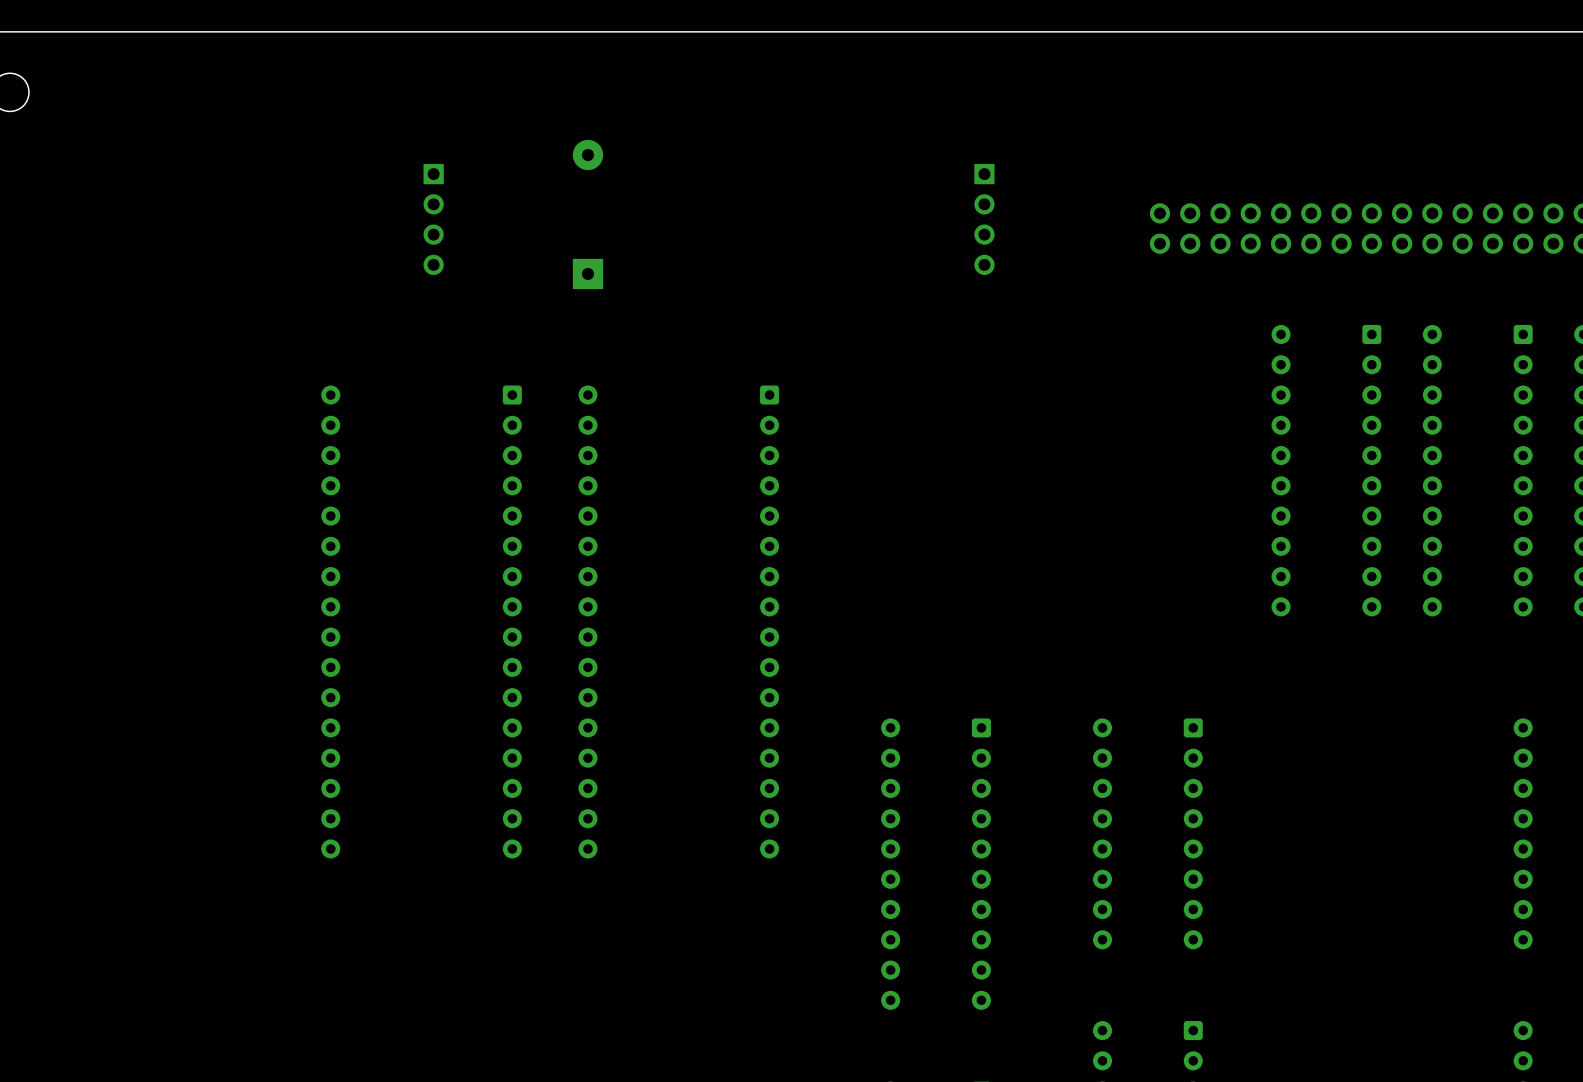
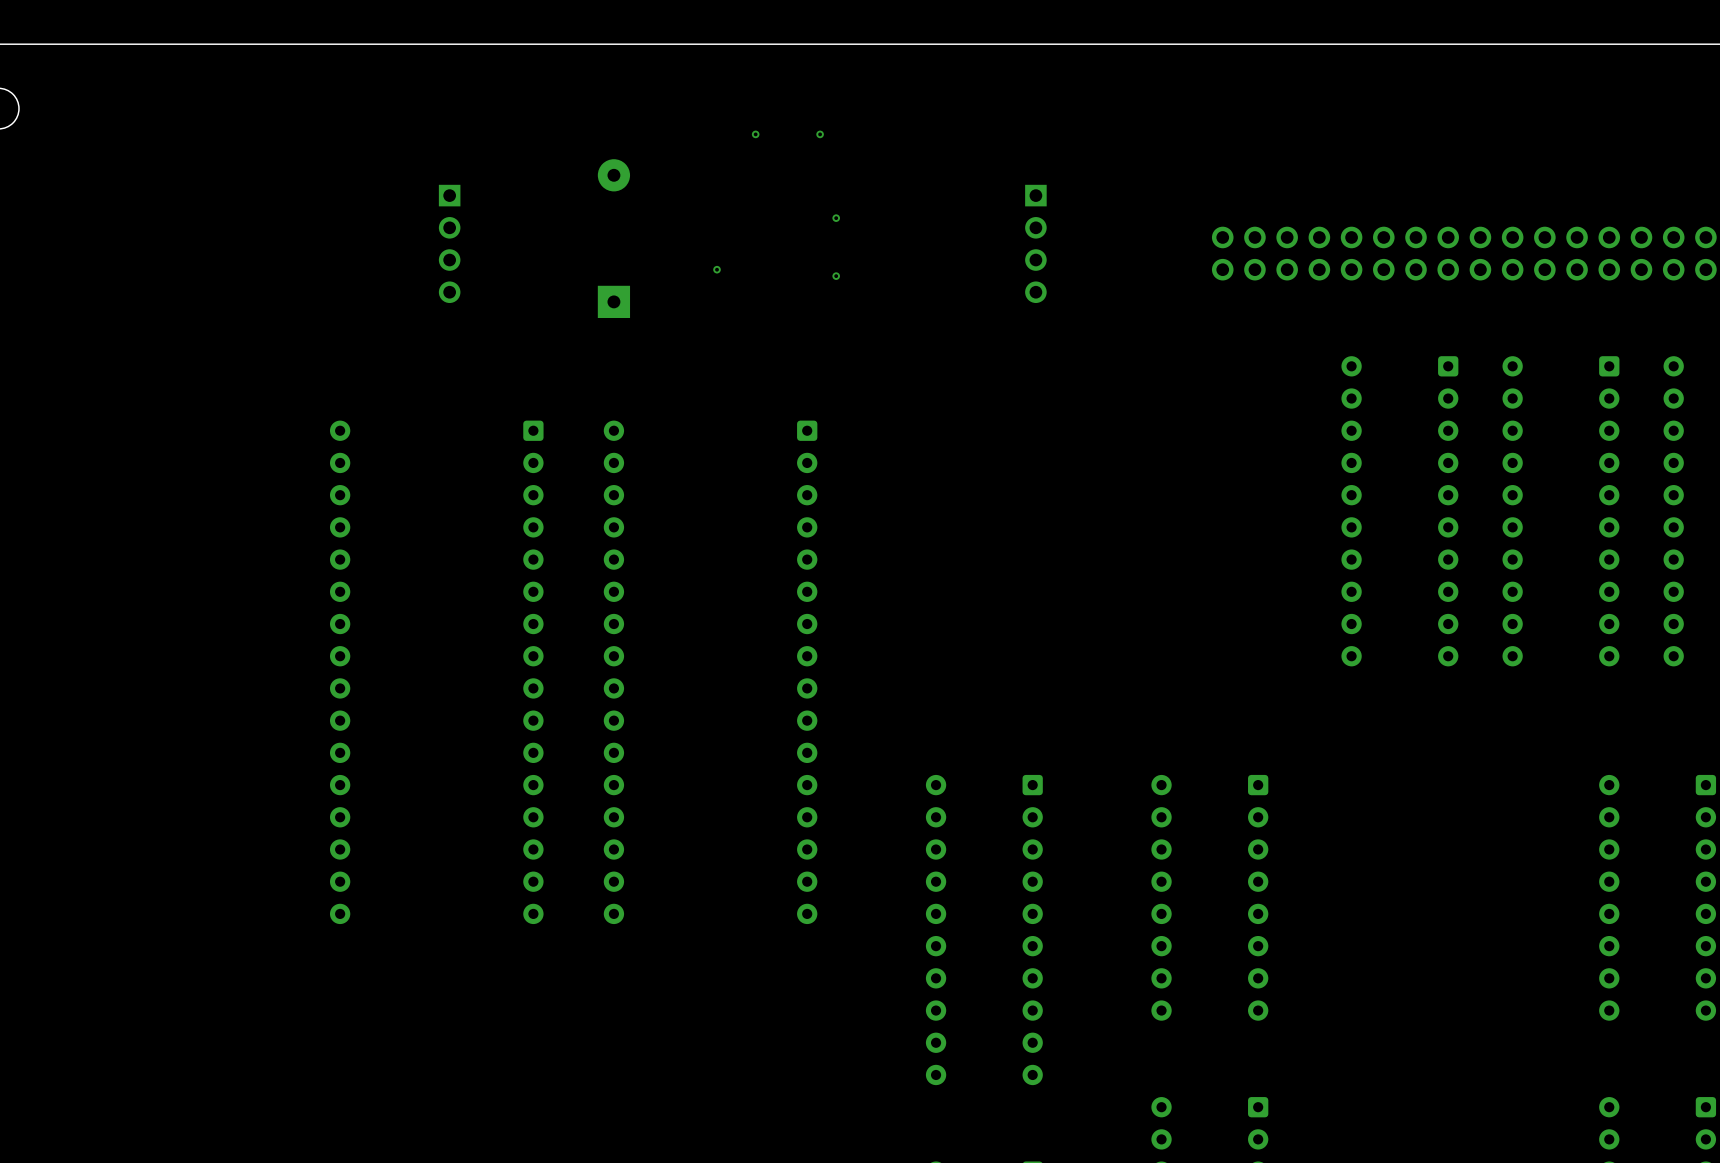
via: none -> (755, 134)
via: none -> (820, 134)
via: none -> (836, 218)
via: none -> (717, 269)
via: none -> (836, 276)

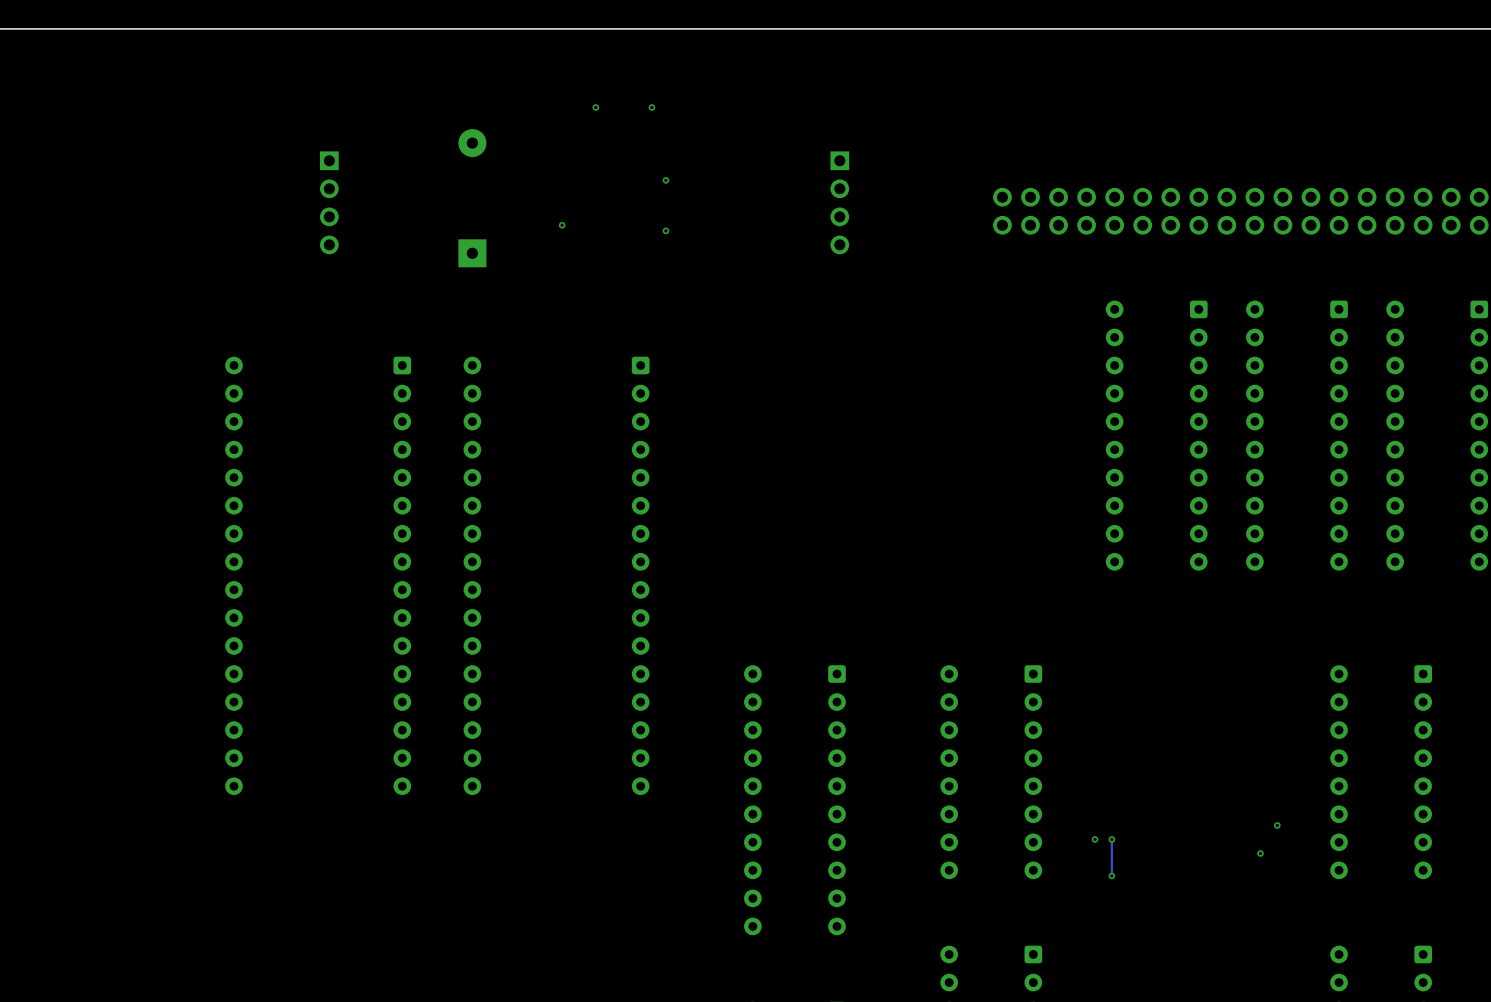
via: none -> (1277, 825)
via: none -> (1095, 839)
track: none -> (1111, 839) (1111, 875)
via: none -> (1111, 839)
via: none -> (1260, 853)
via: none -> (1111, 875)

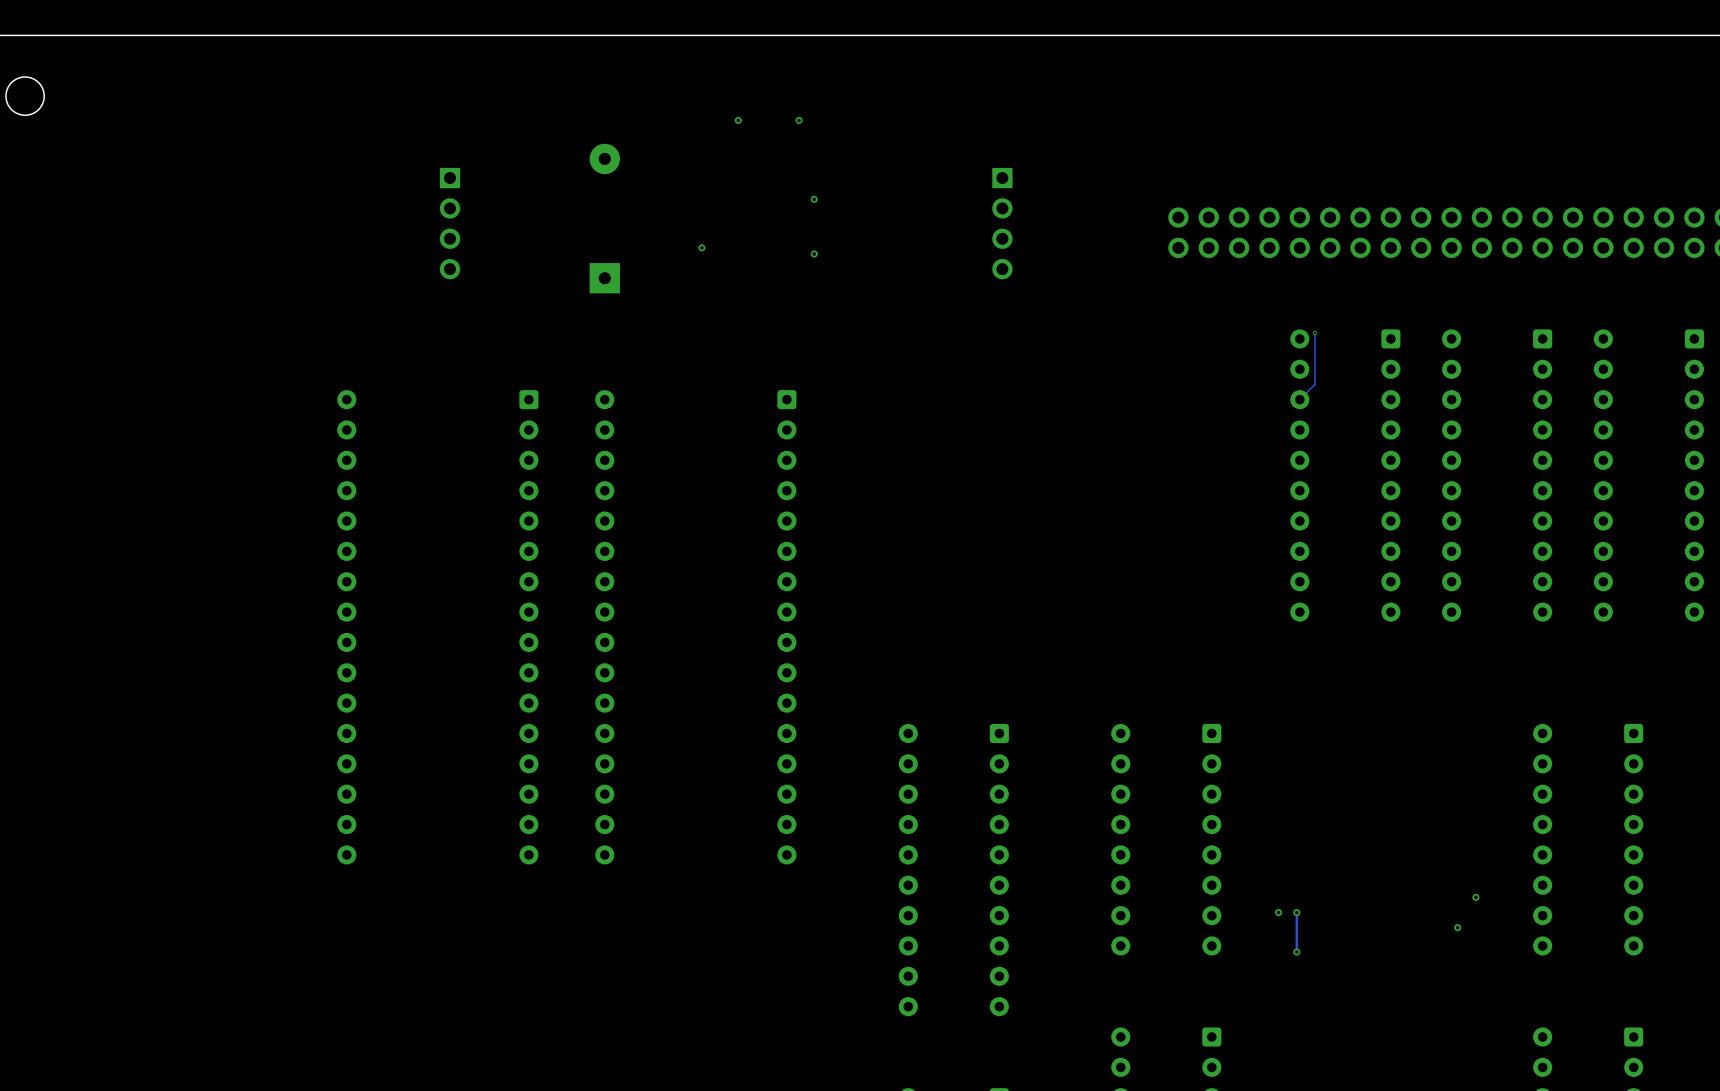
track: none -> (1315, 332) (1315, 384) (1299, 399)
via: none -> (1315, 332)

